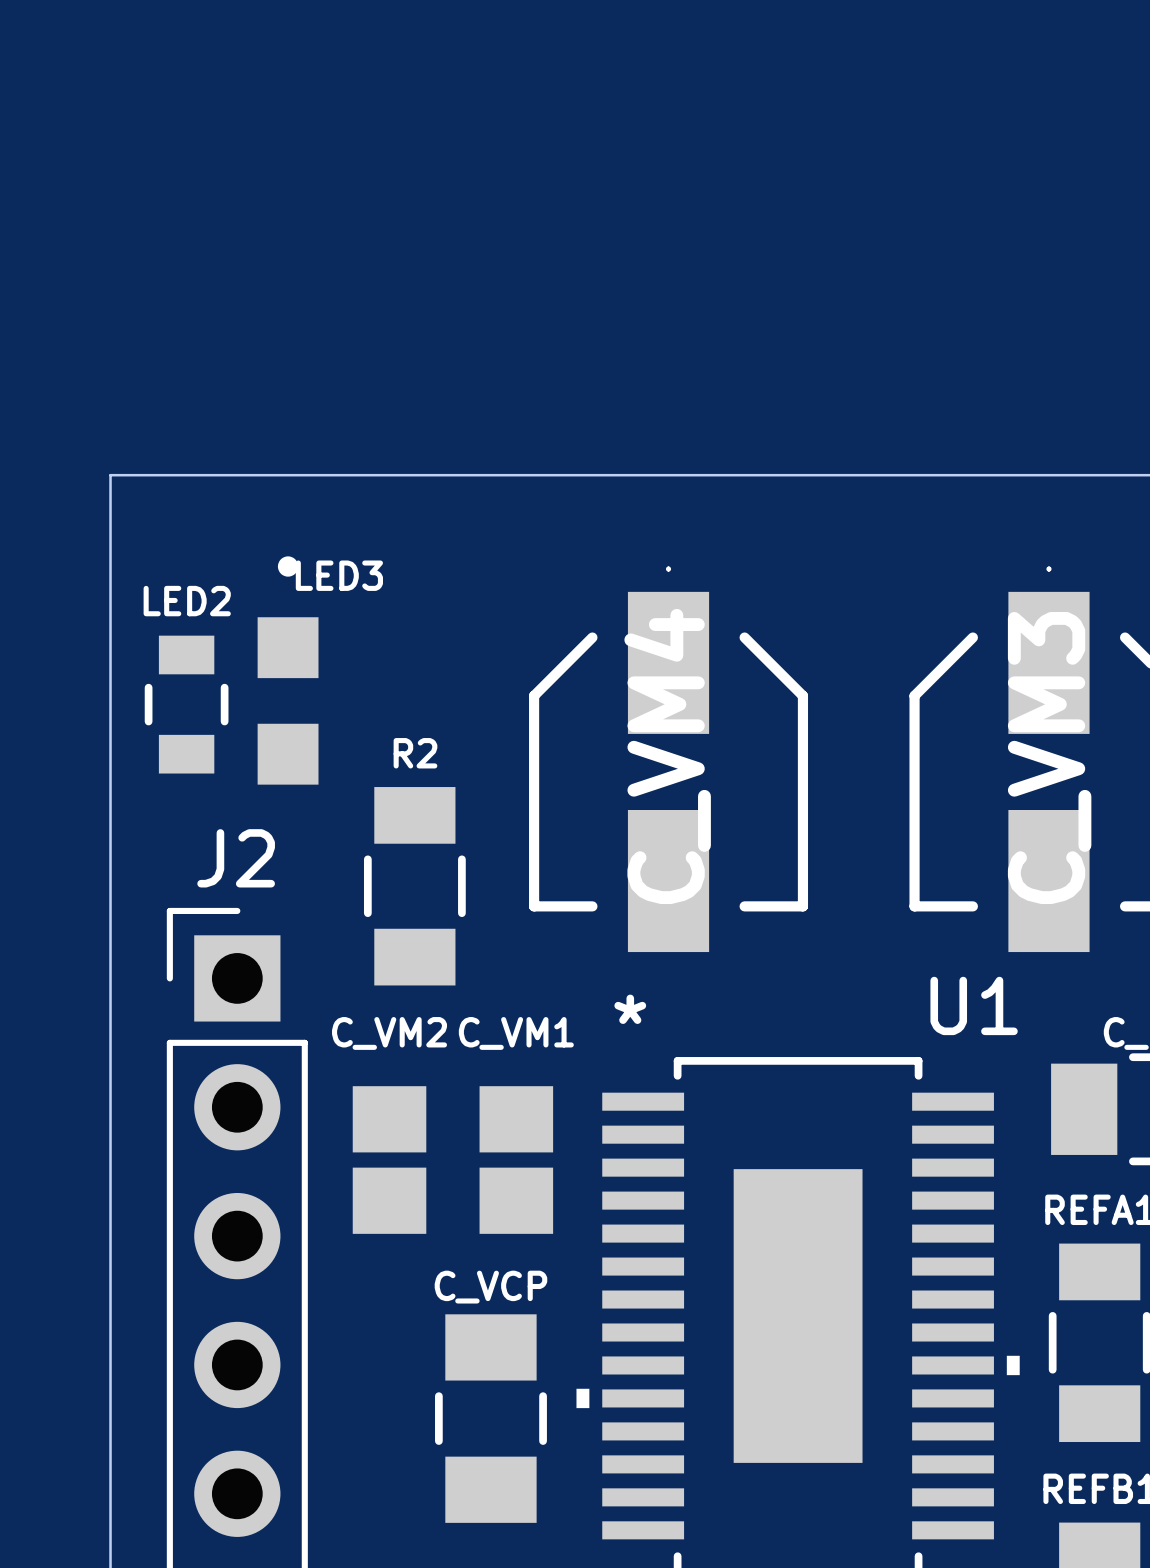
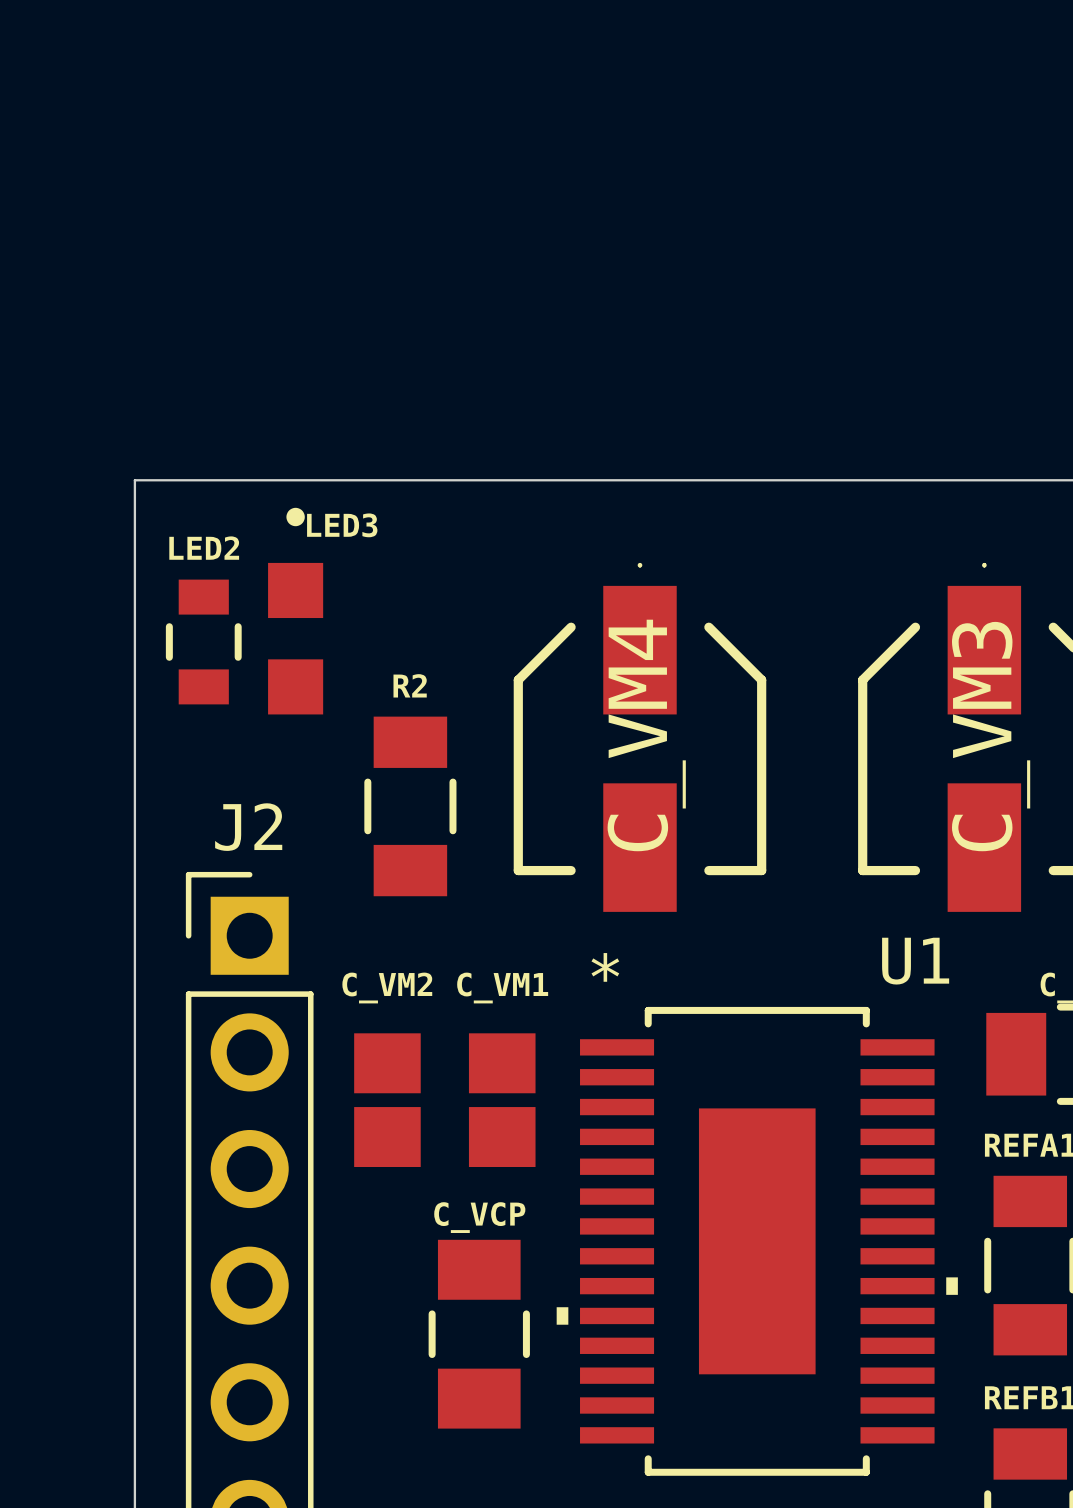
LED3 position: (288, 670) -> (295, 611)
LED2 position: (186, 704) -> (203, 642)
R2 position: (414, 886) -> (410, 806)

